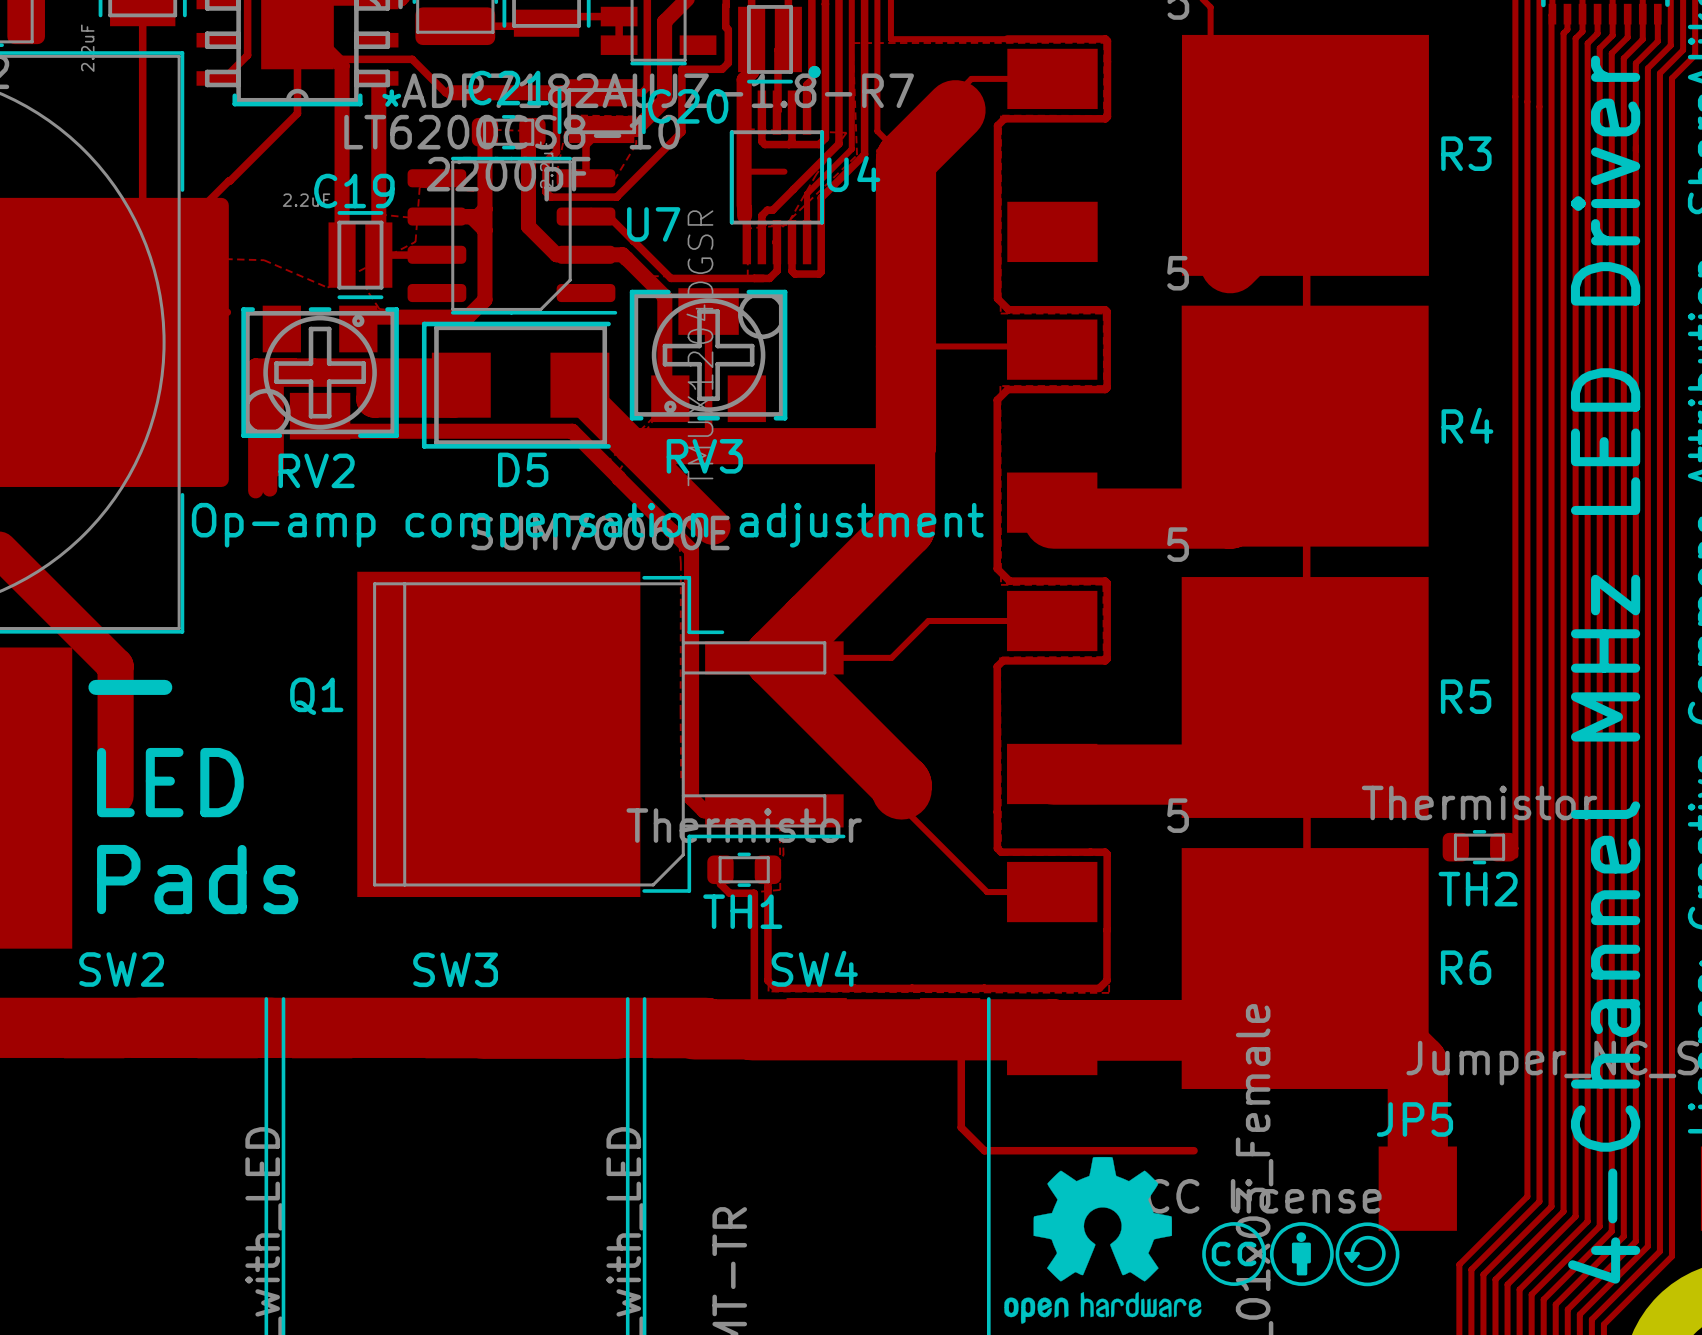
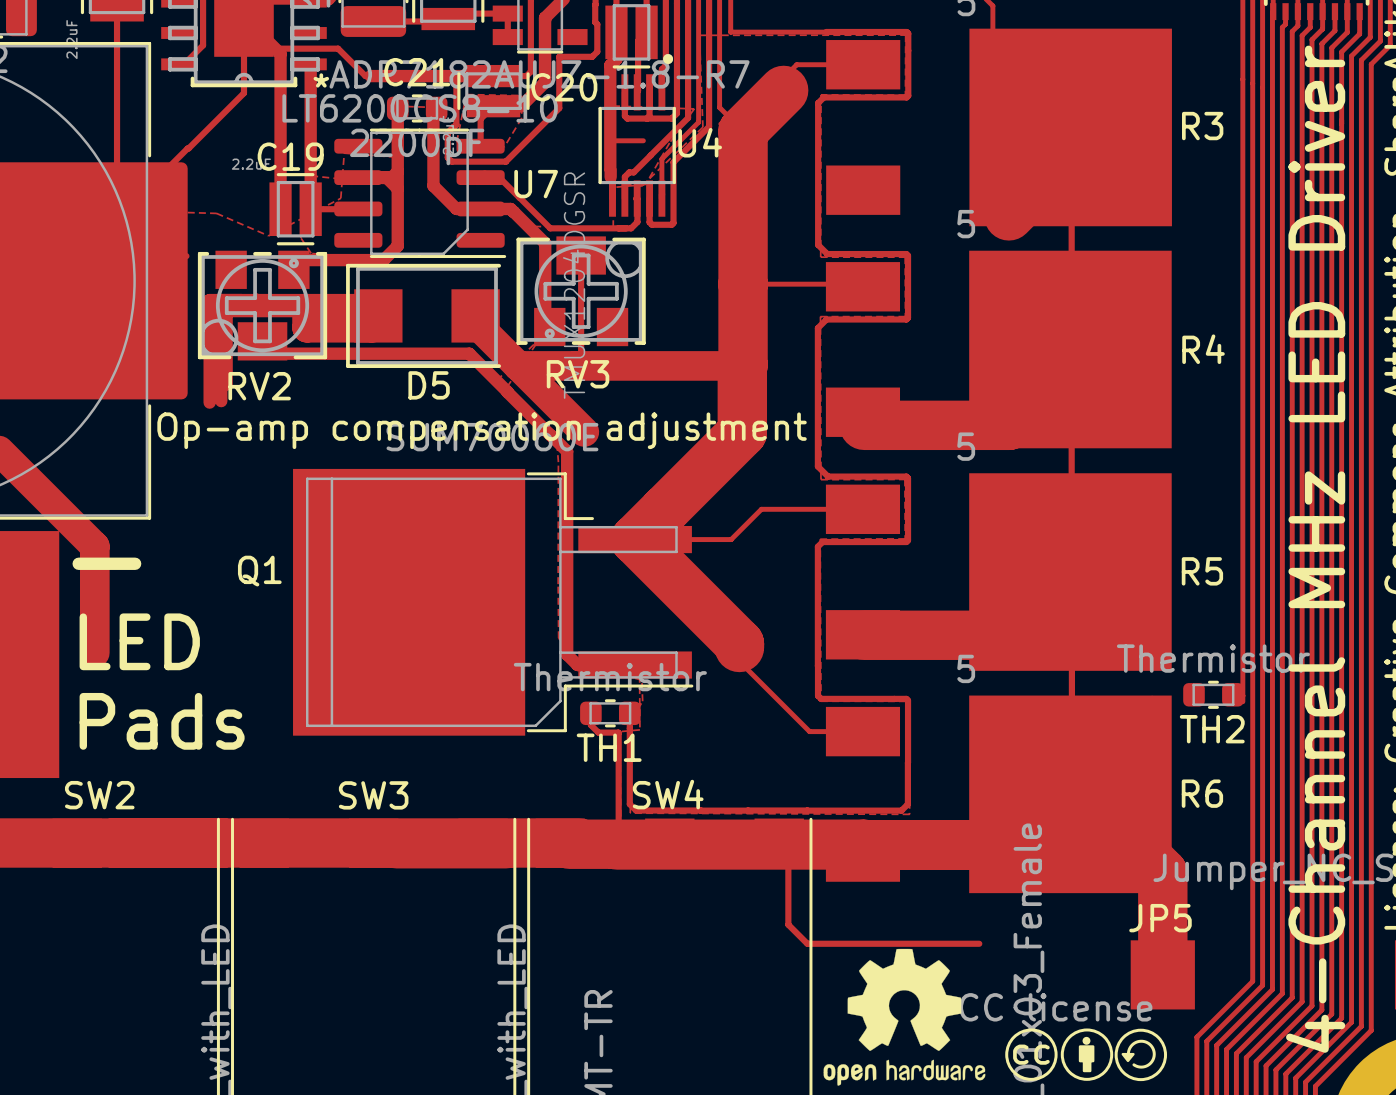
drawing position: (1300, 1254) -> (1086, 1054)

